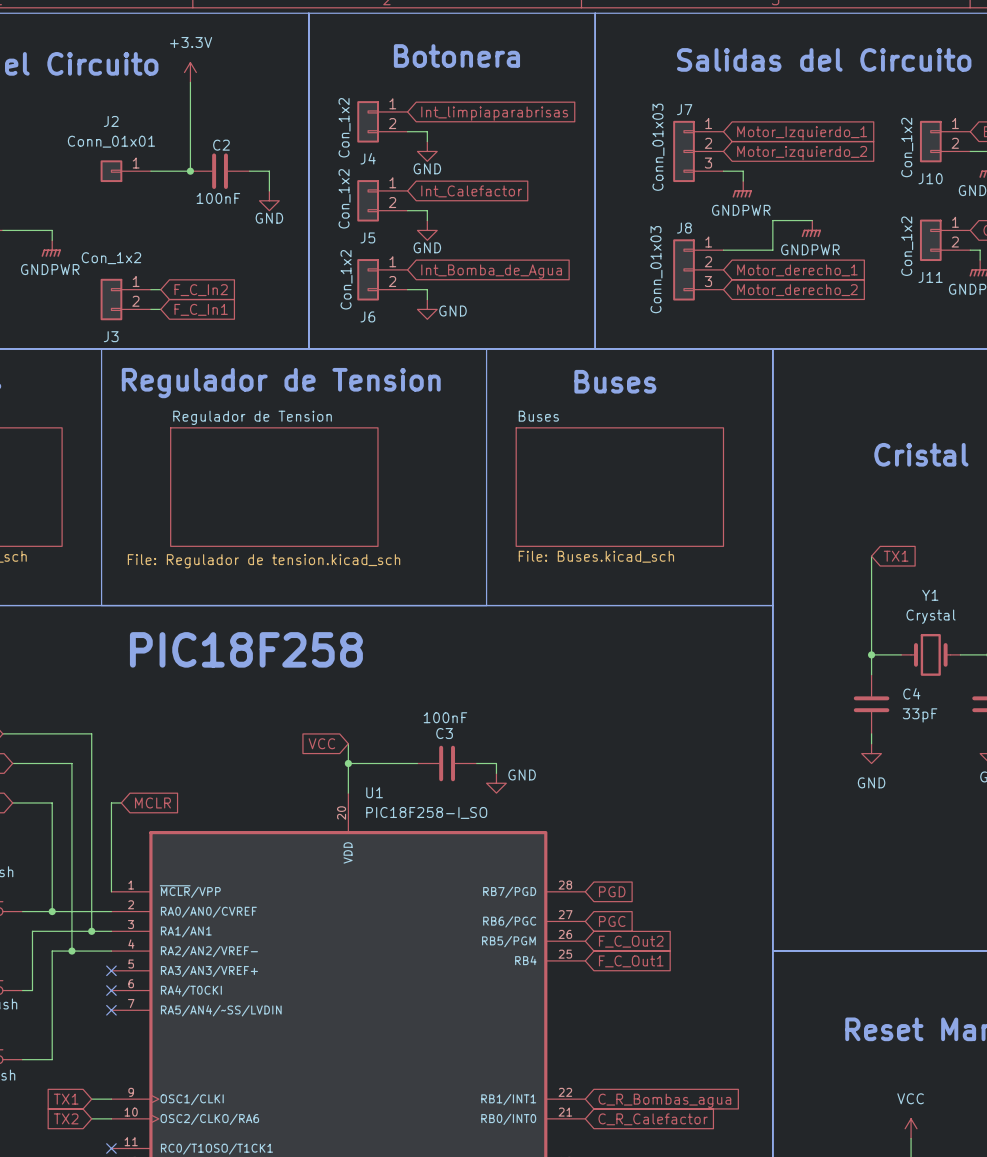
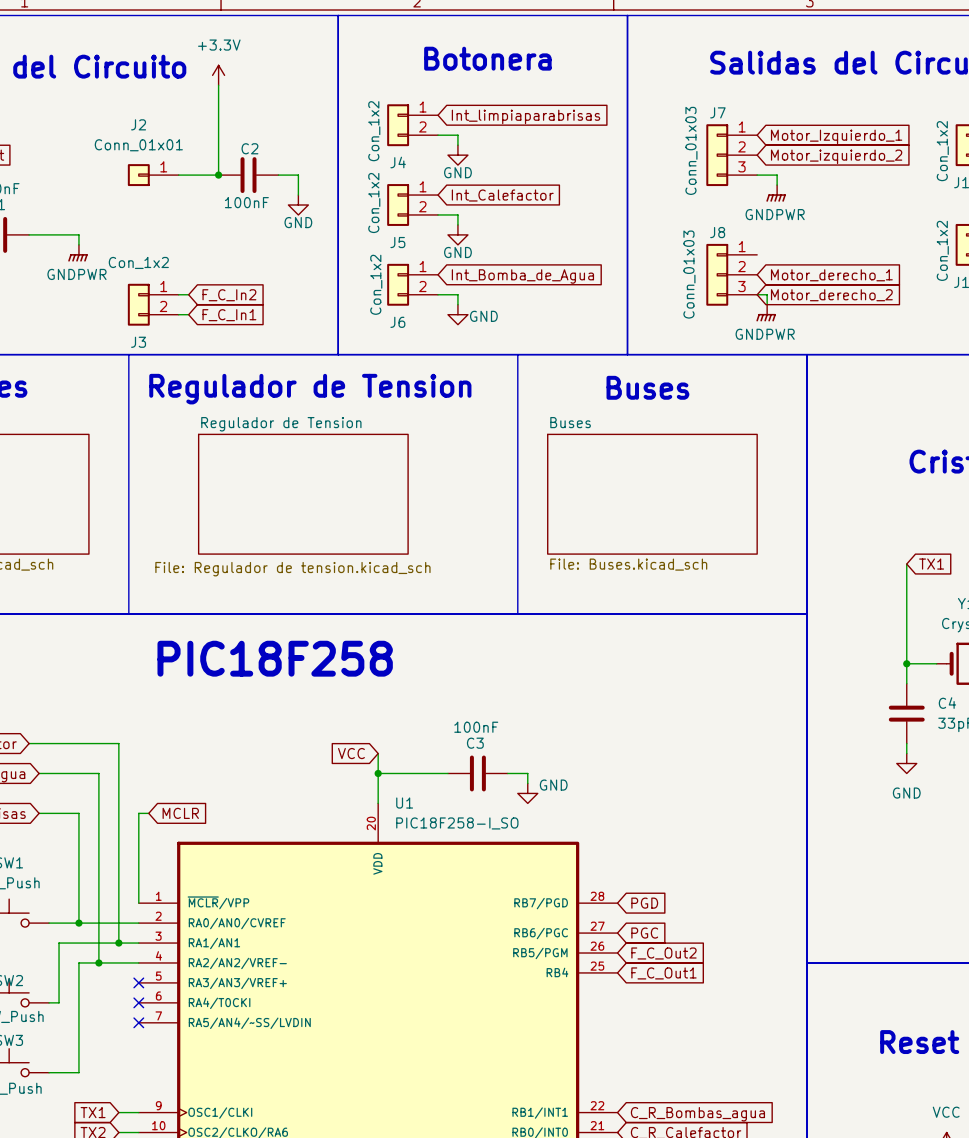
wire: (812, 220) (772, 220) (772, 250) (723, 250) -> none
power symbol position: GNDPWR (811, 228) -> GNDPWR (766, 313)
wire: none -> (757, 294) (767, 294) (767, 304)

